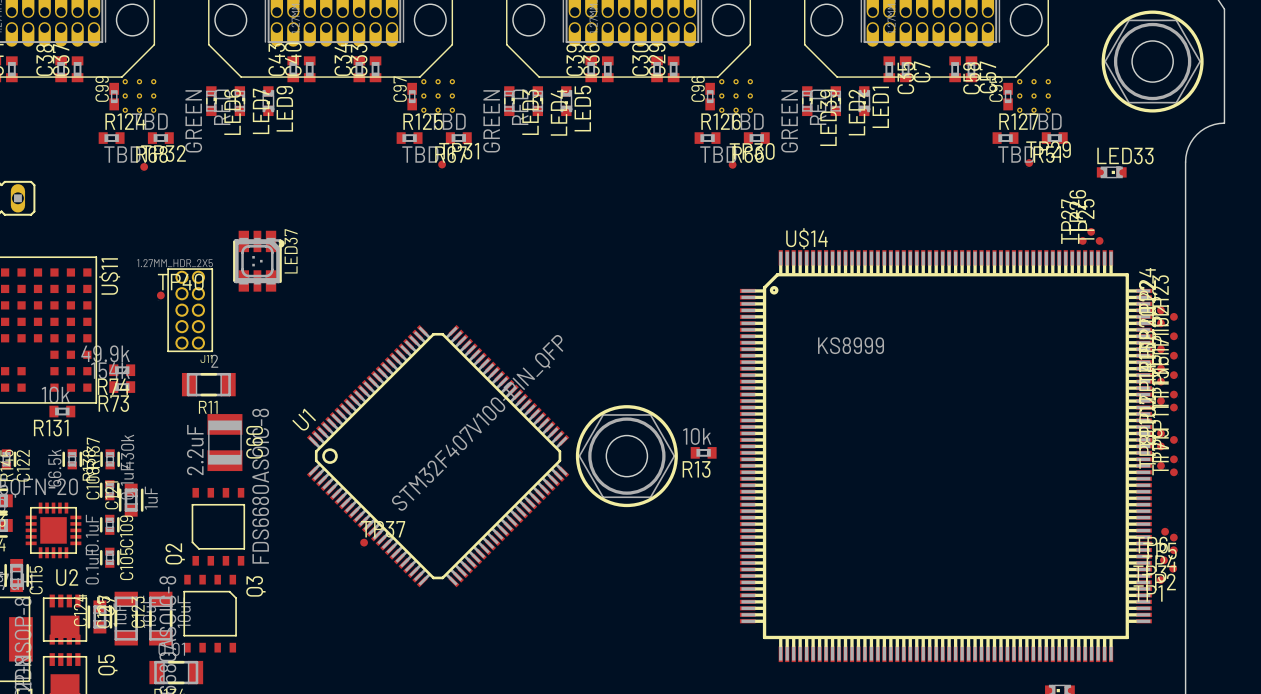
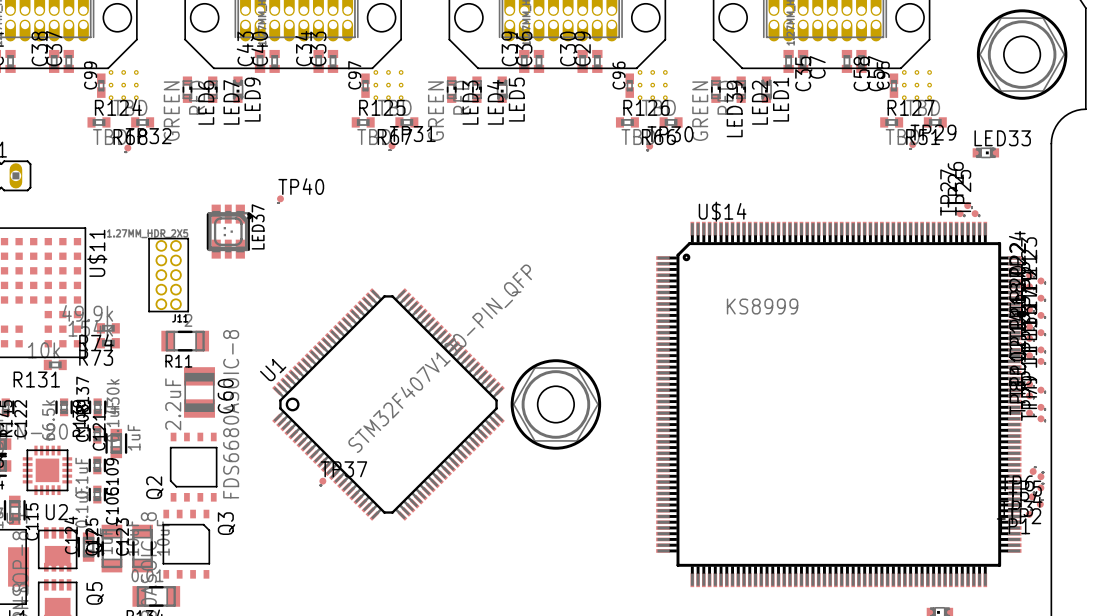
TP40 position: (160, 295) -> (280, 198)
R13: 10k (703, 452) -> none

